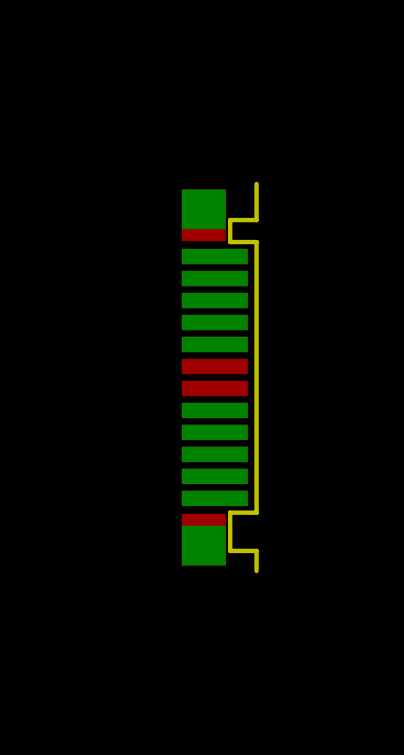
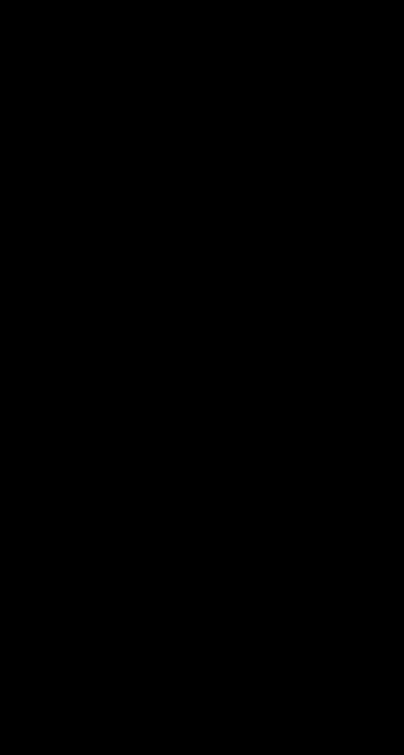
part: (220, 377) -> none

